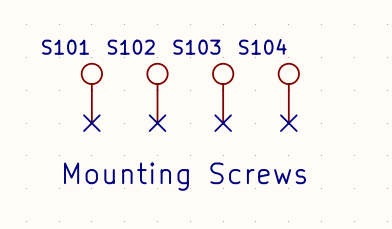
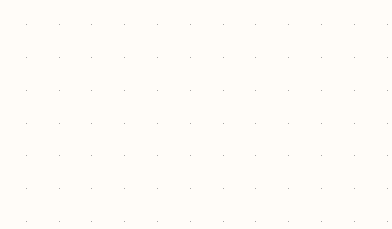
S101: (91, 93) -> none
S102: (157, 93) -> none
S103: (223, 93) -> none
S104: (288, 93) -> none
no-connect mark: (91, 123) -> none
no-connect mark: (157, 123) -> none
no-connect mark: (223, 123) -> none
no-connect mark: (288, 123) -> none
text: Mounting Screws (185, 176) -> none

